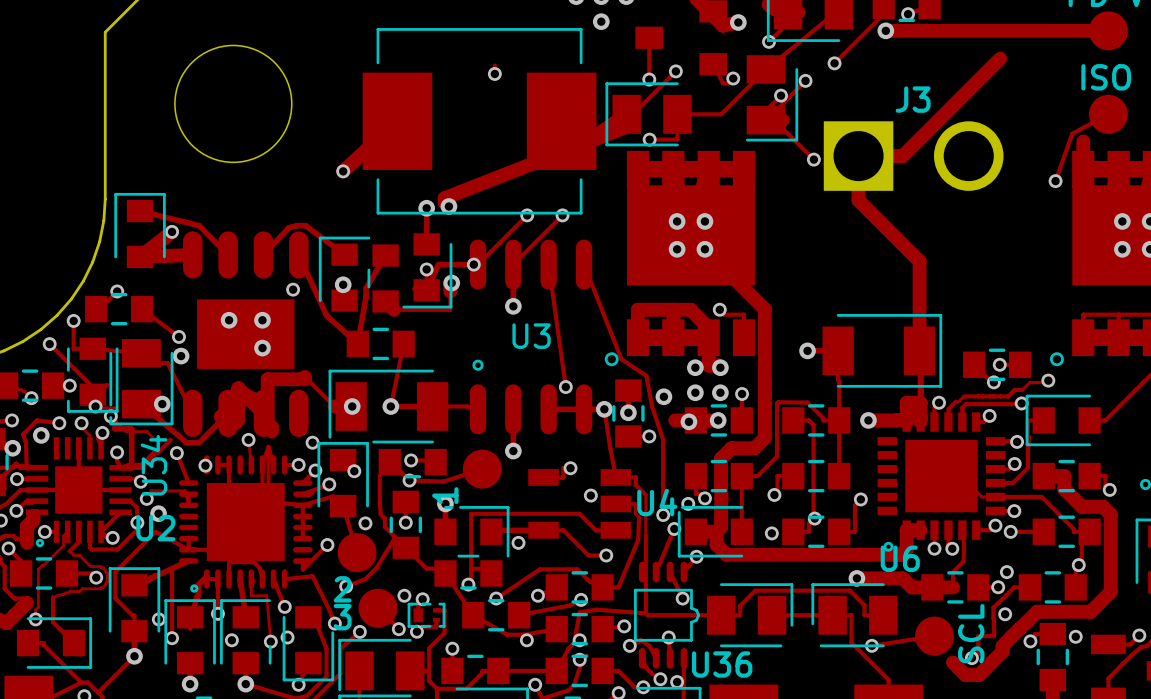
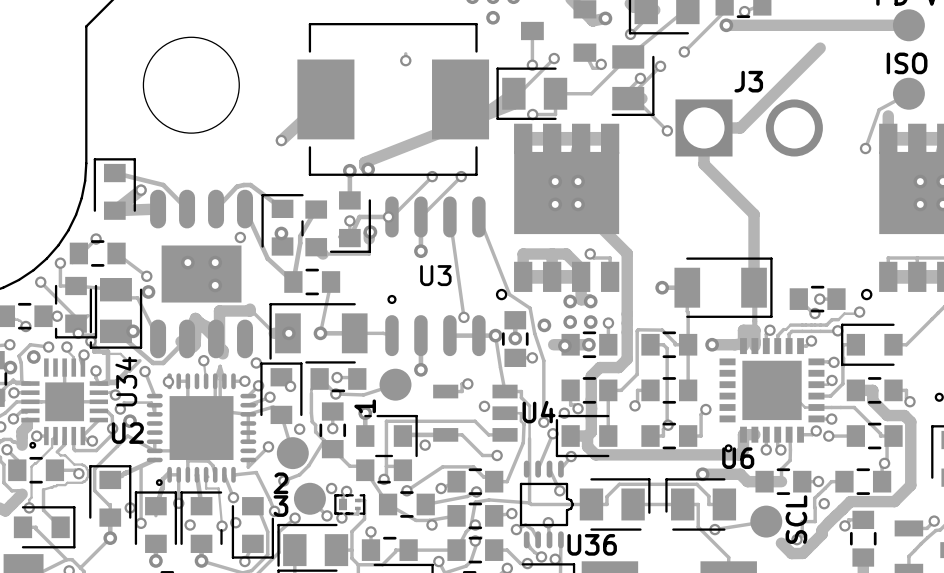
via: (771, 533) -> none
via: (1006, 572) -> none
via: (1075, 636) -> none

